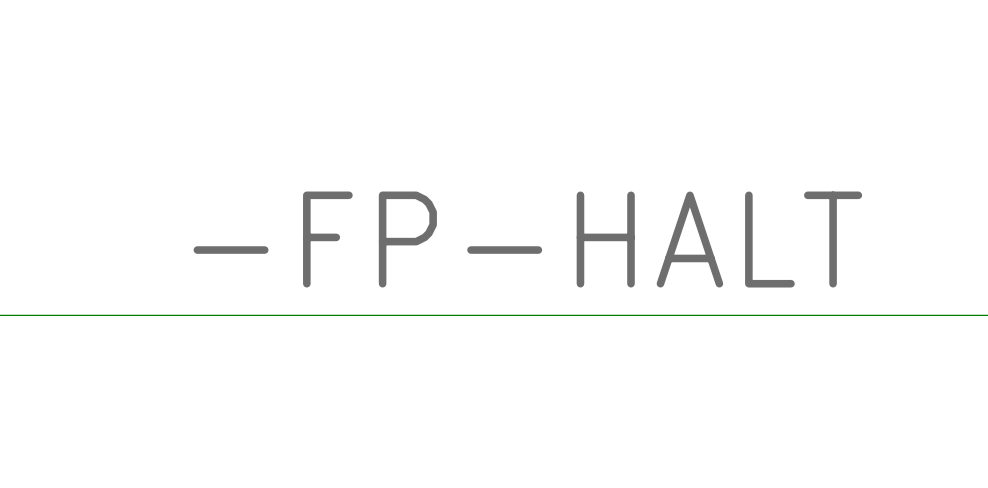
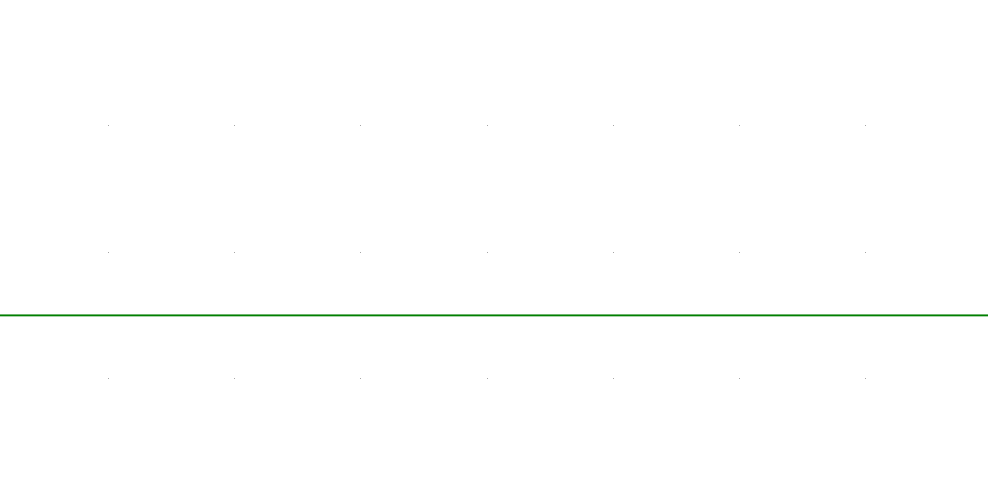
label: -FP-HALT (527, 239) -> none

